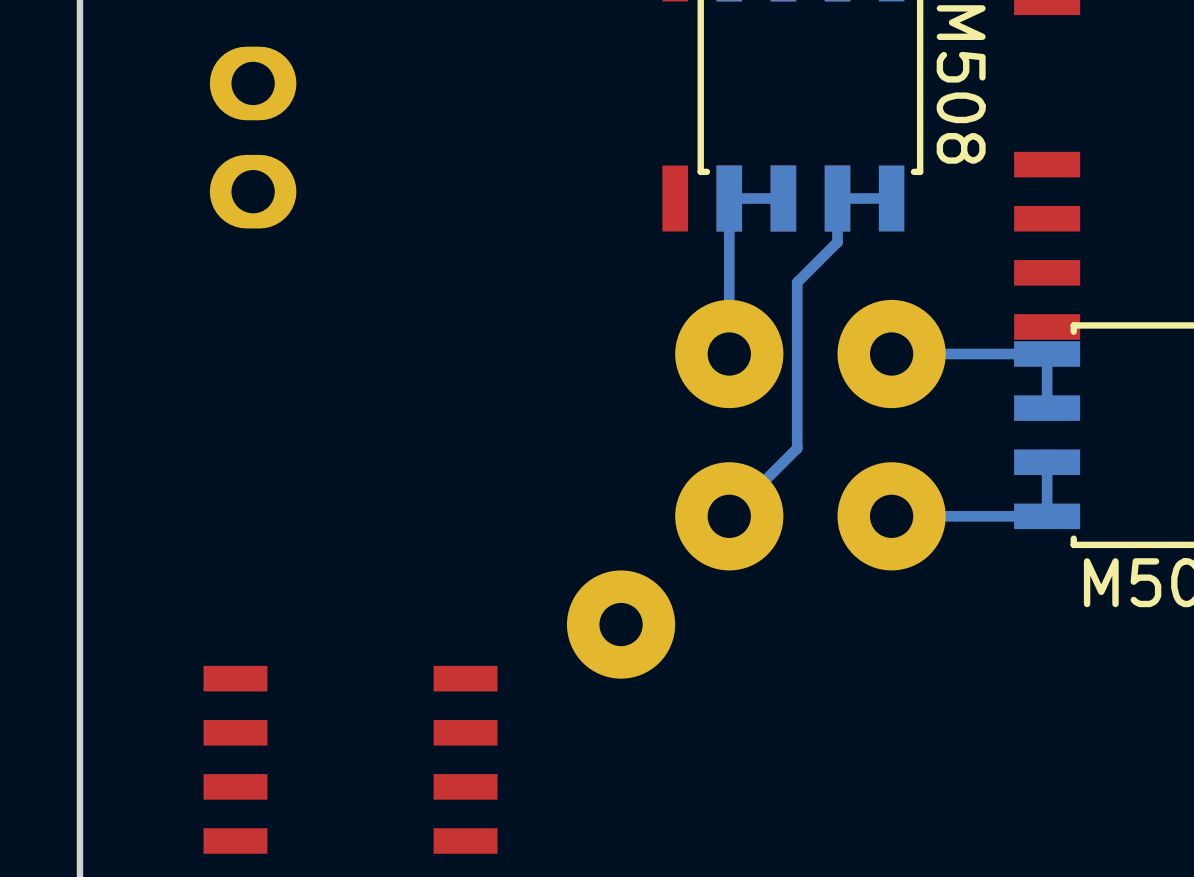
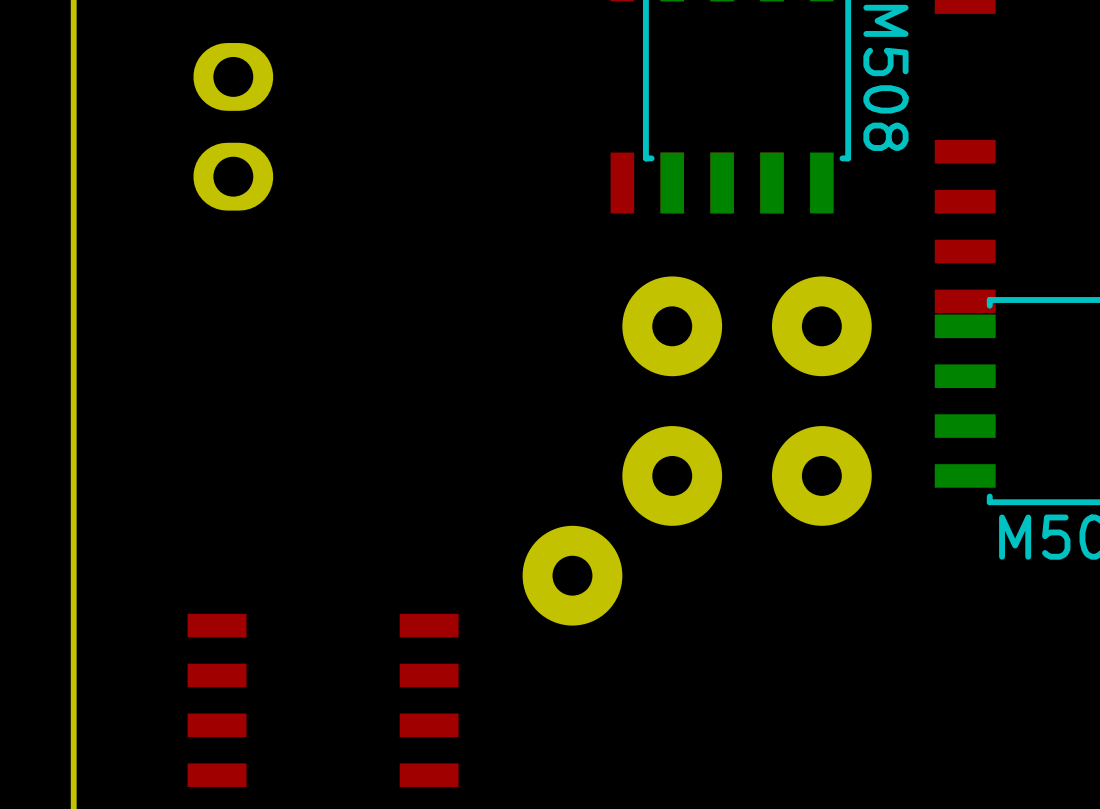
bottom track: (783, 198) (729, 198) (729, 354) -> none
bottom track: (891, 198) (837, 198) (837, 242) (797, 282) (797, 448) (729, 516) -> none
bottom track: (891, 354) (1047, 354) (1047, 408) -> none
bottom track: (1047, 462) (1047, 516) (891, 516) -> none

